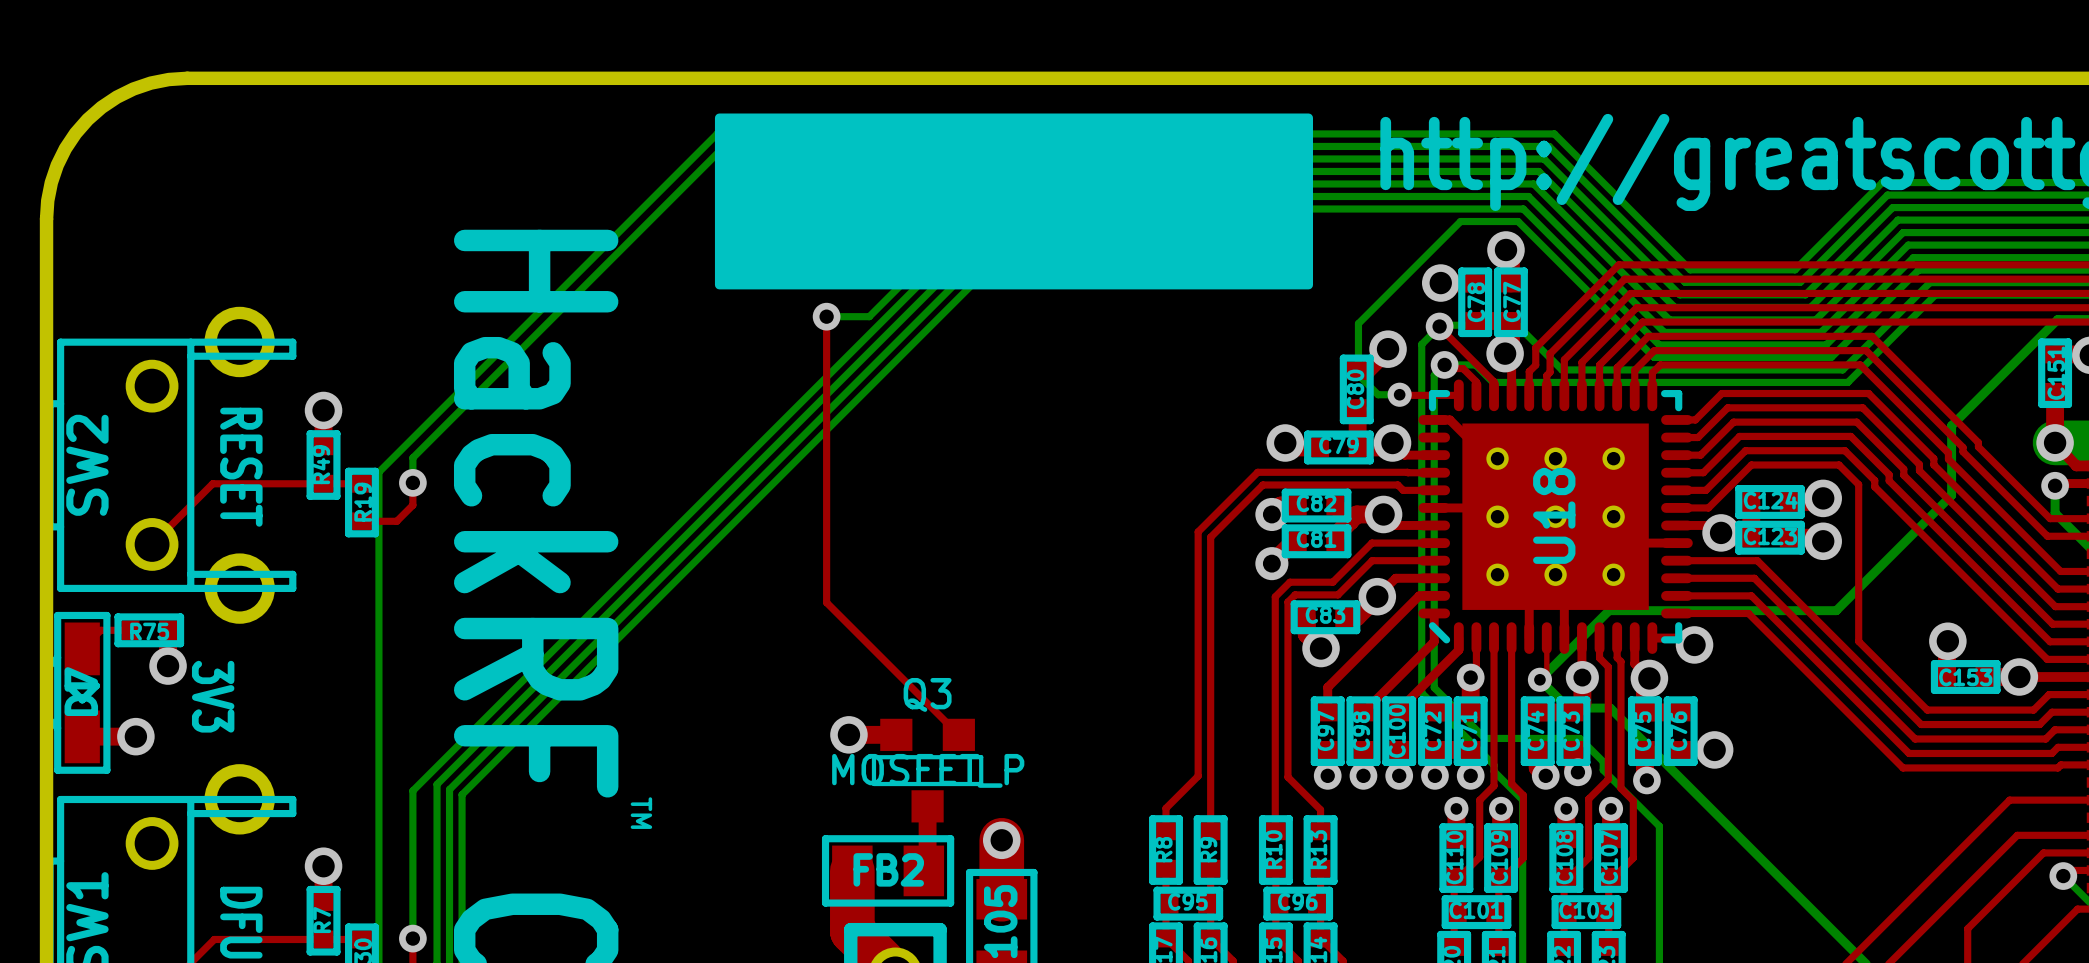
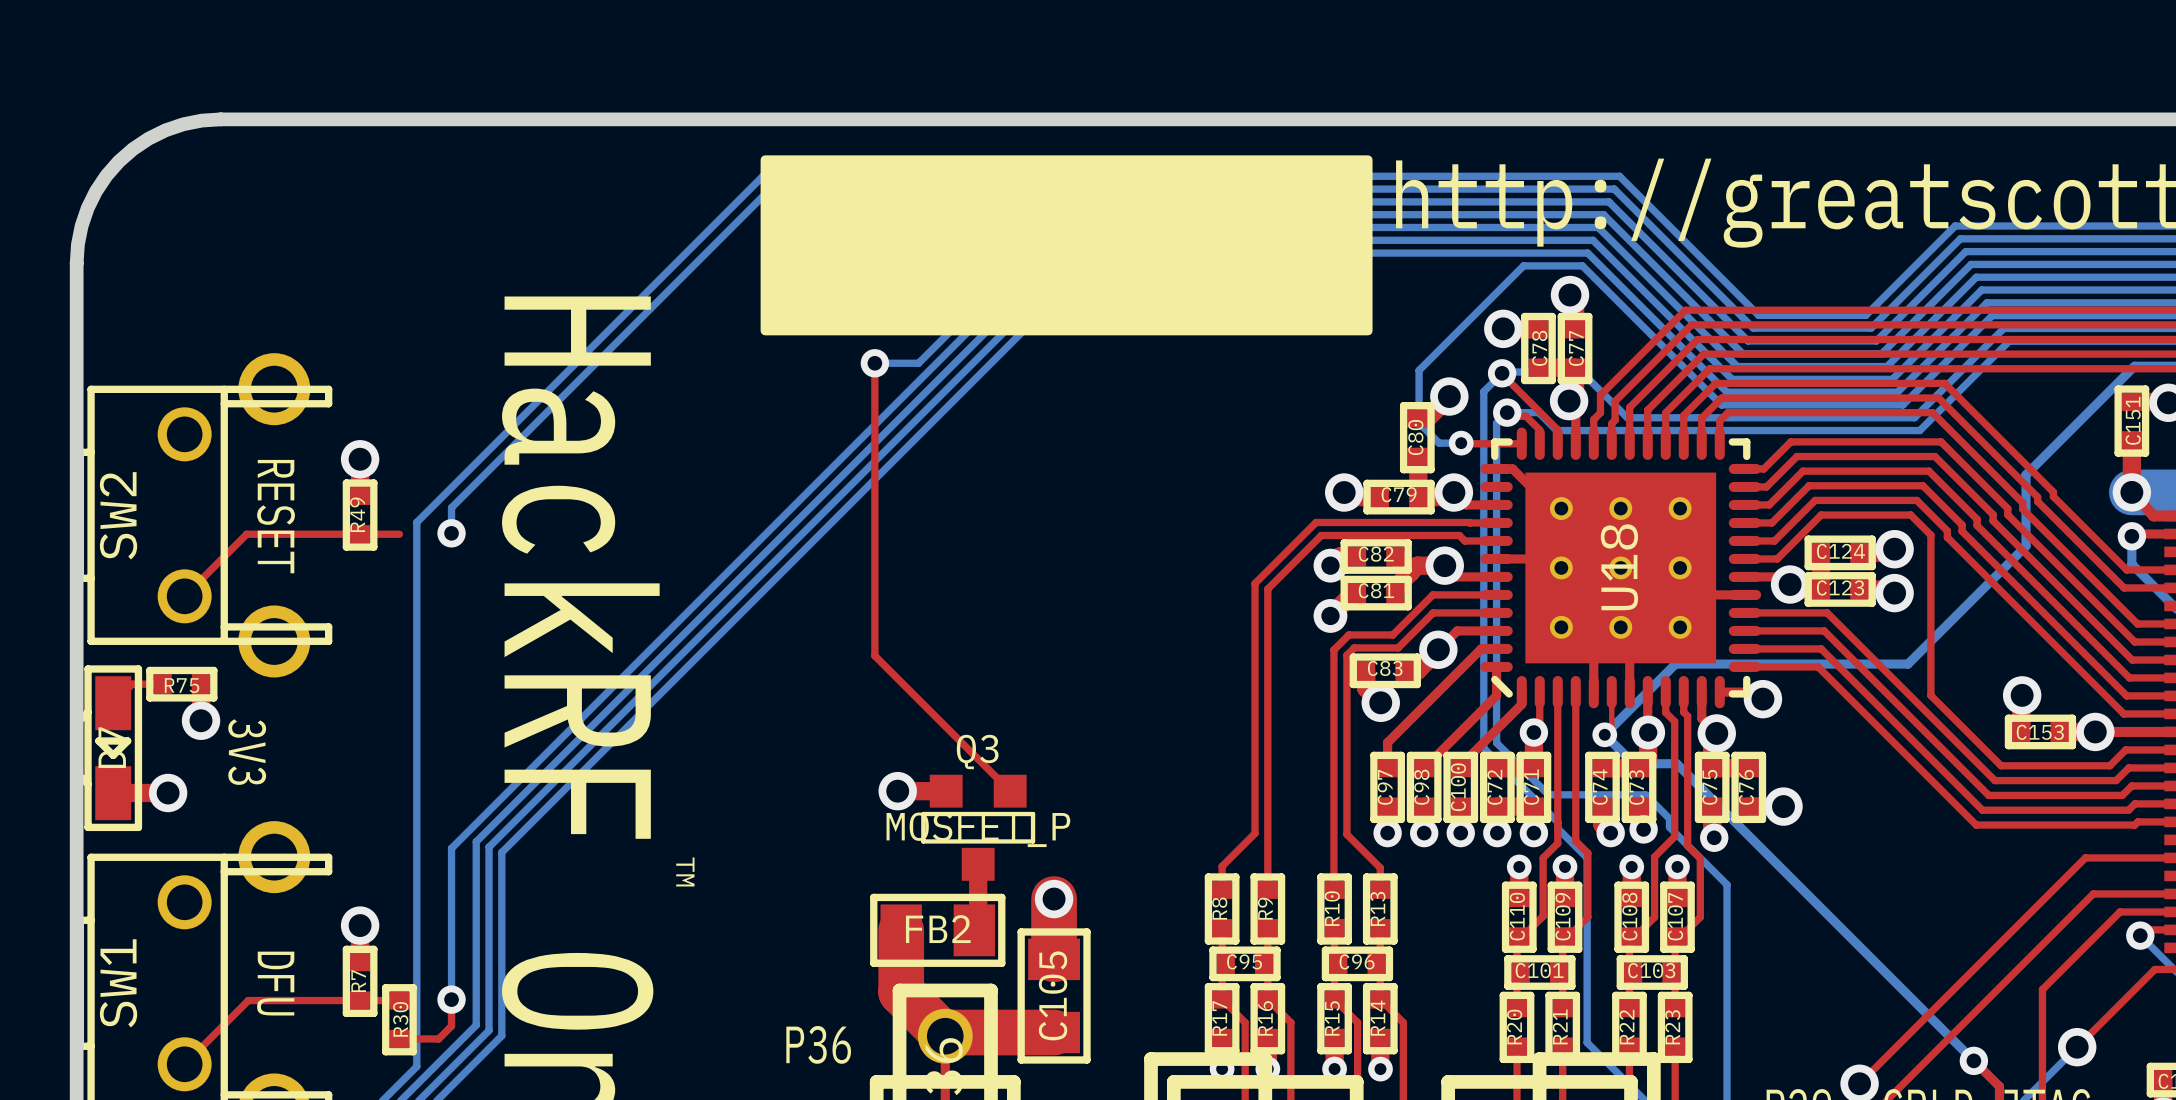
top track: (412, 482) (412, 505) (396, 521) (361, 521) -> none
R19: (361, 502) -> none

